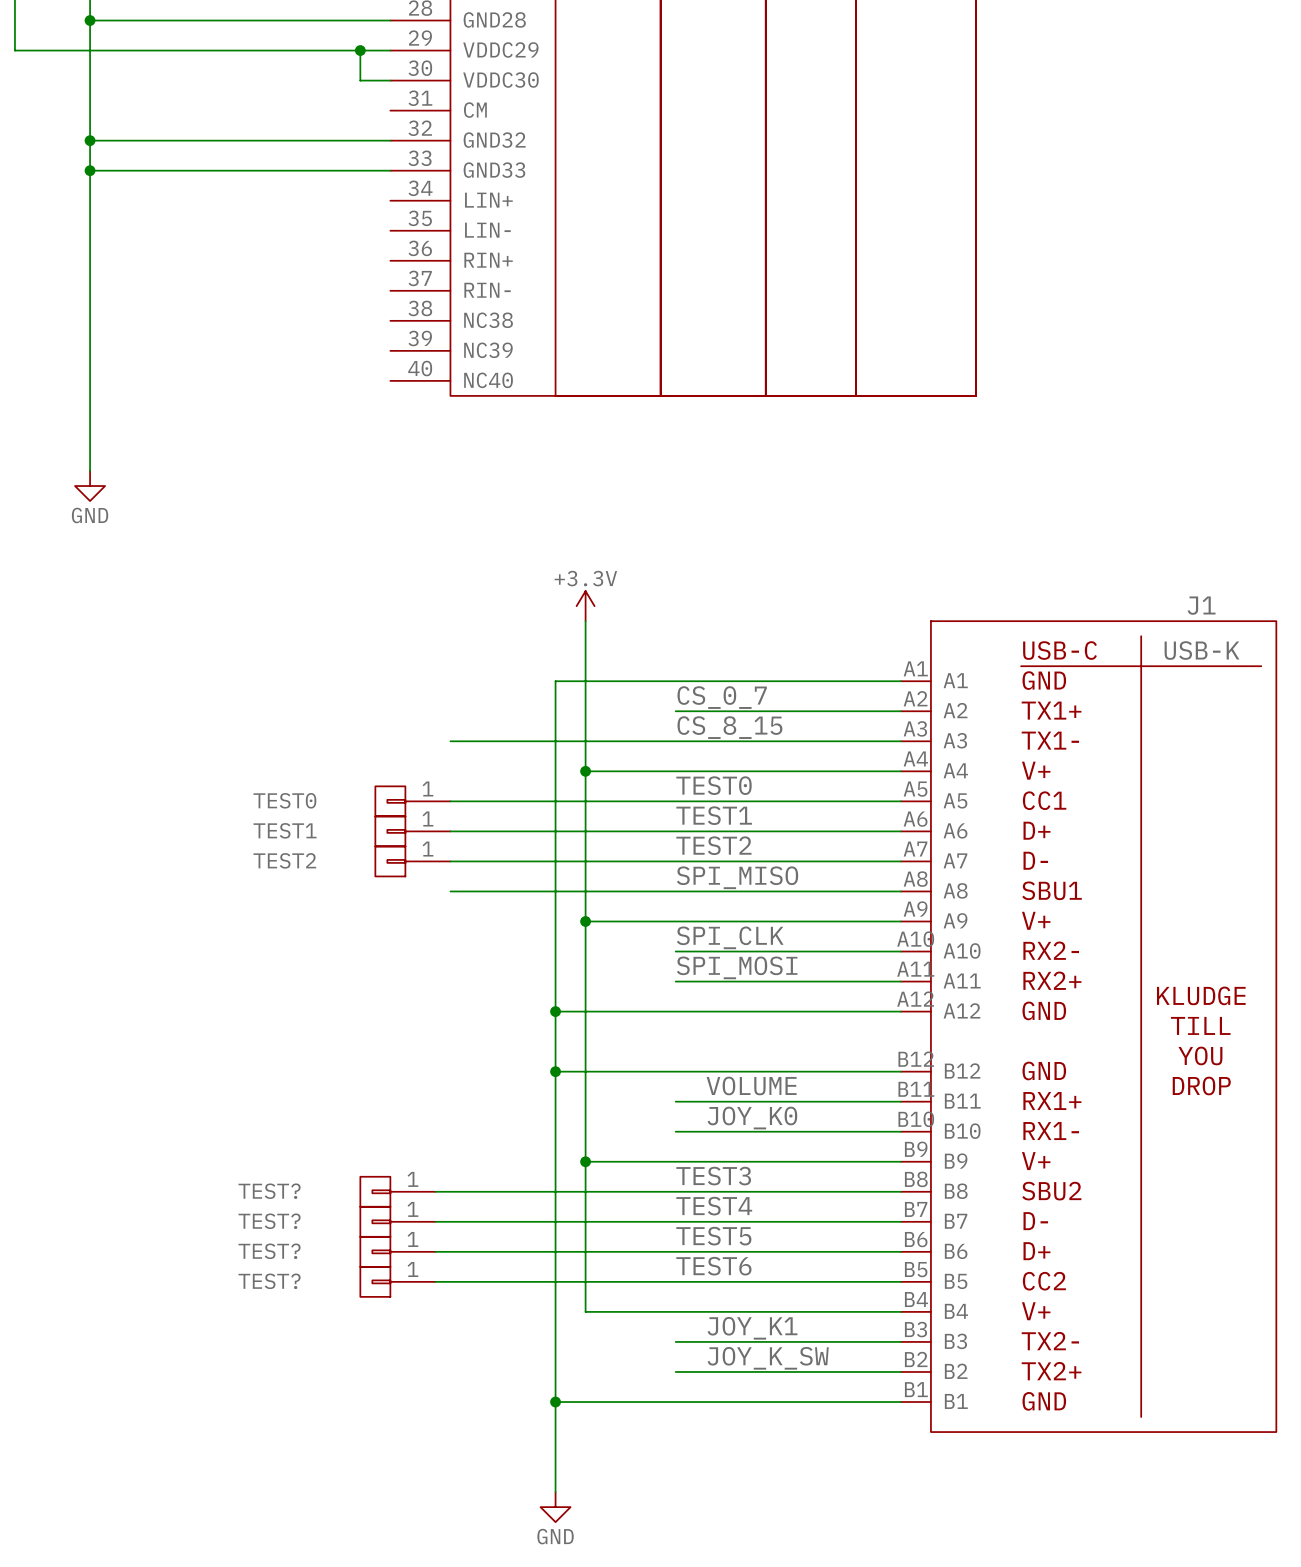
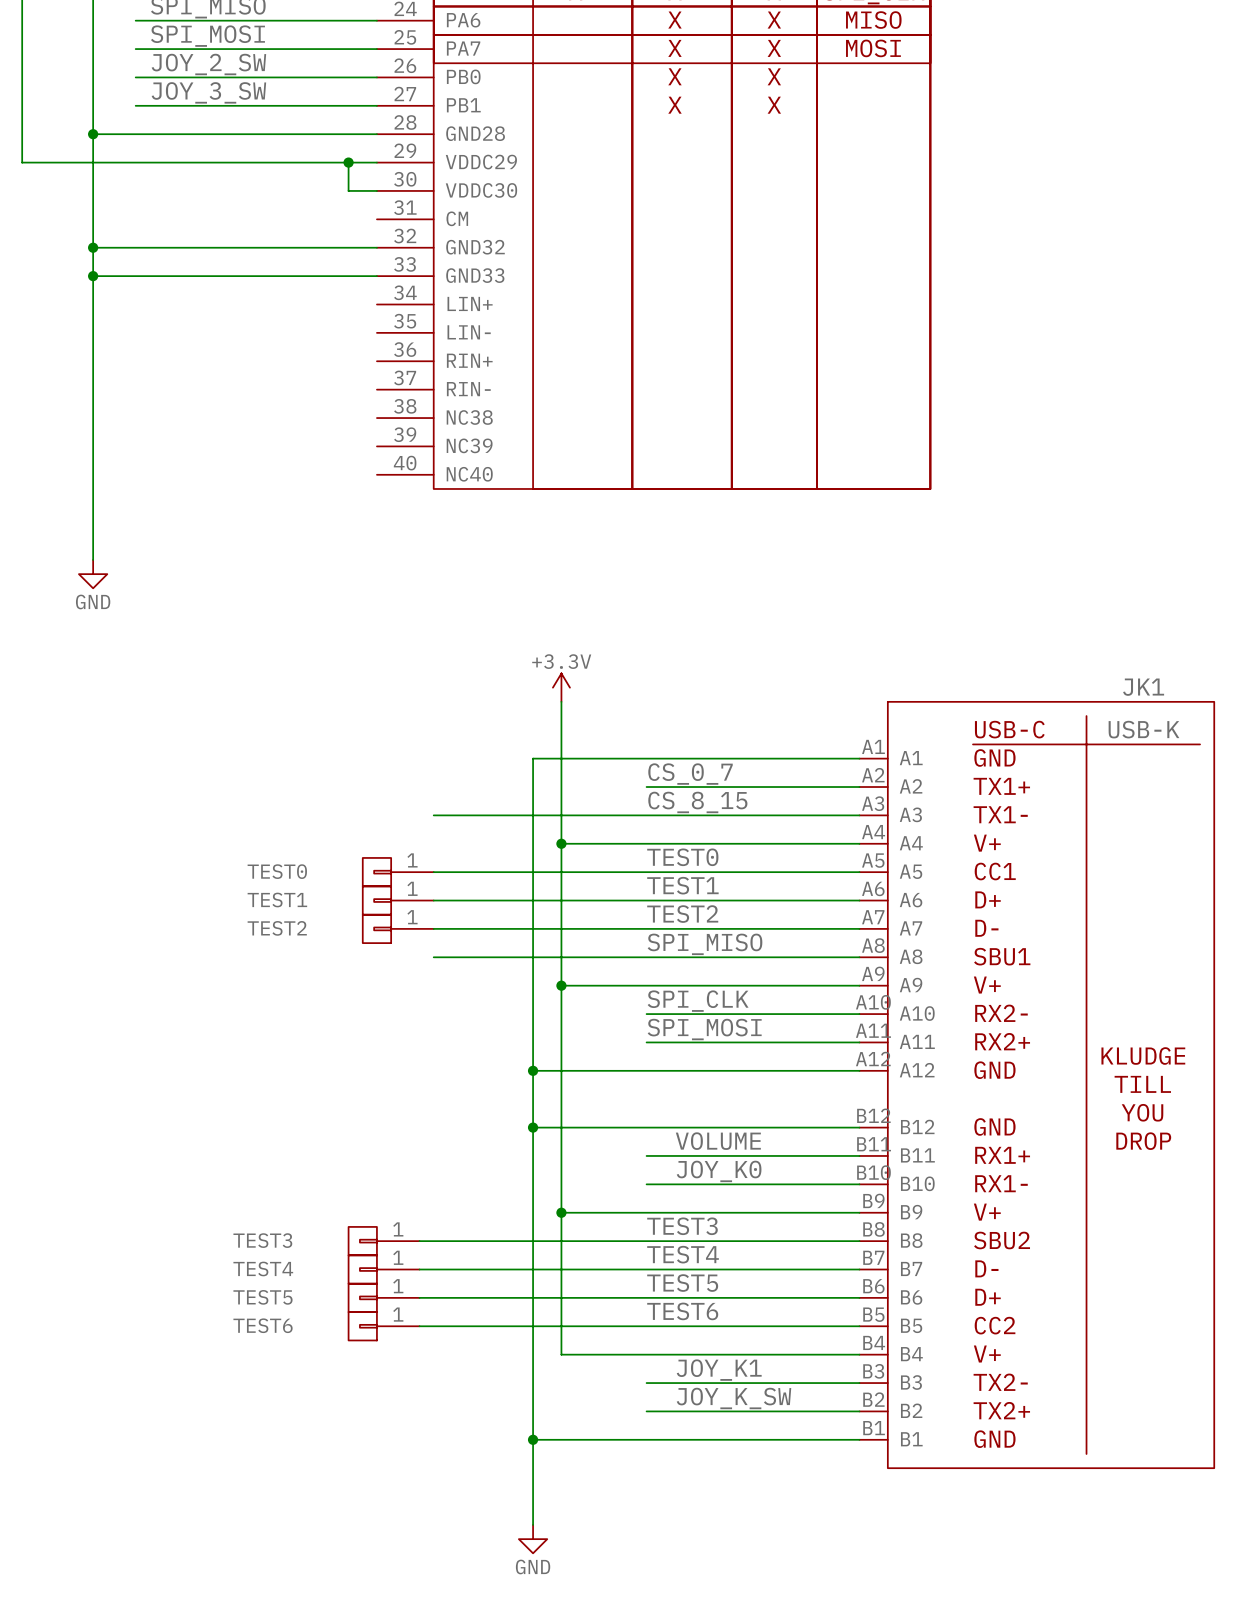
J1 name: J1 (1201, 605) -> JK1 (1143, 687)
TEST? name: TEST? (269, 1191) -> TEST3 (262, 1240)
TEST? name: TEST? (269, 1221) -> TEST4 (263, 1268)
TEST? name: TEST? (269, 1251) -> TEST5 (262, 1297)
TEST? name: TEST? (269, 1281) -> TEST6 (263, 1325)

